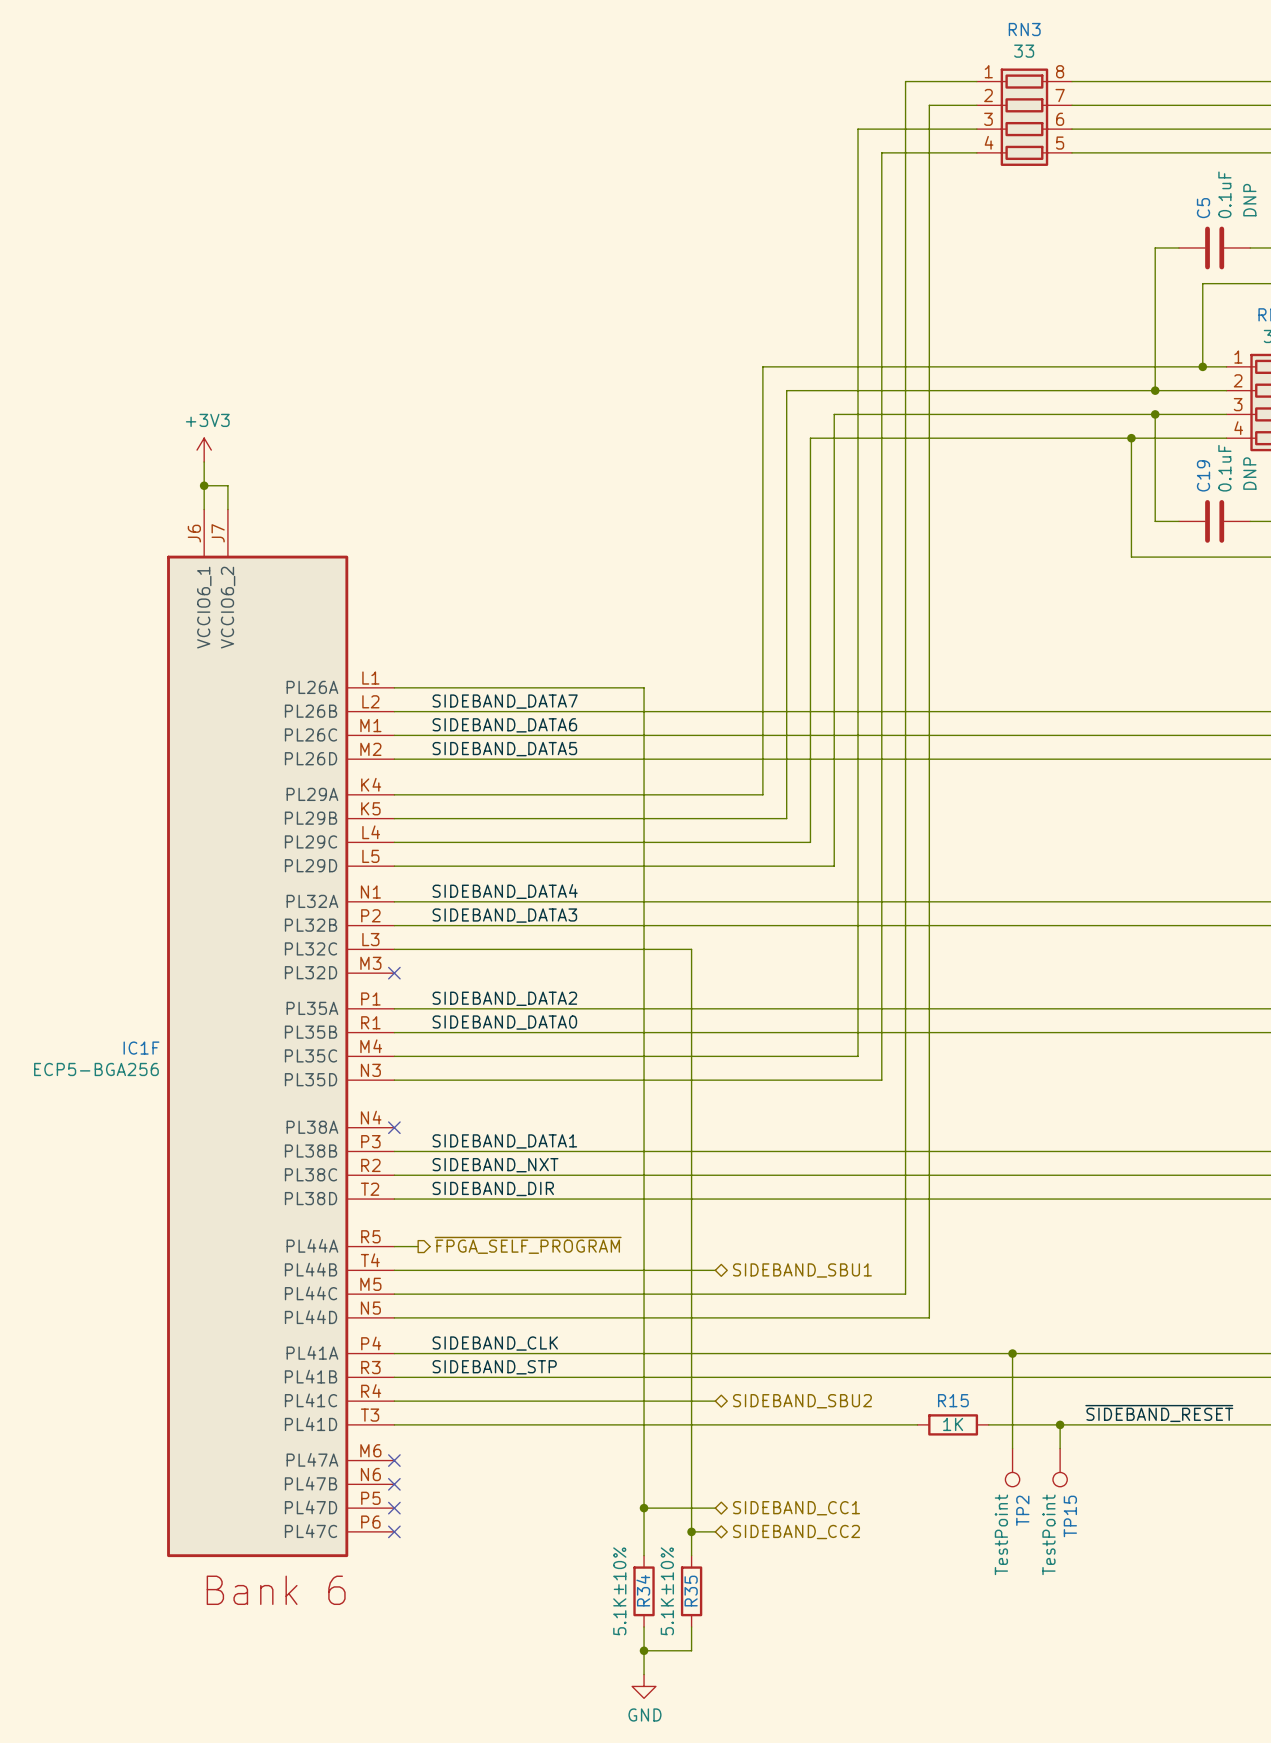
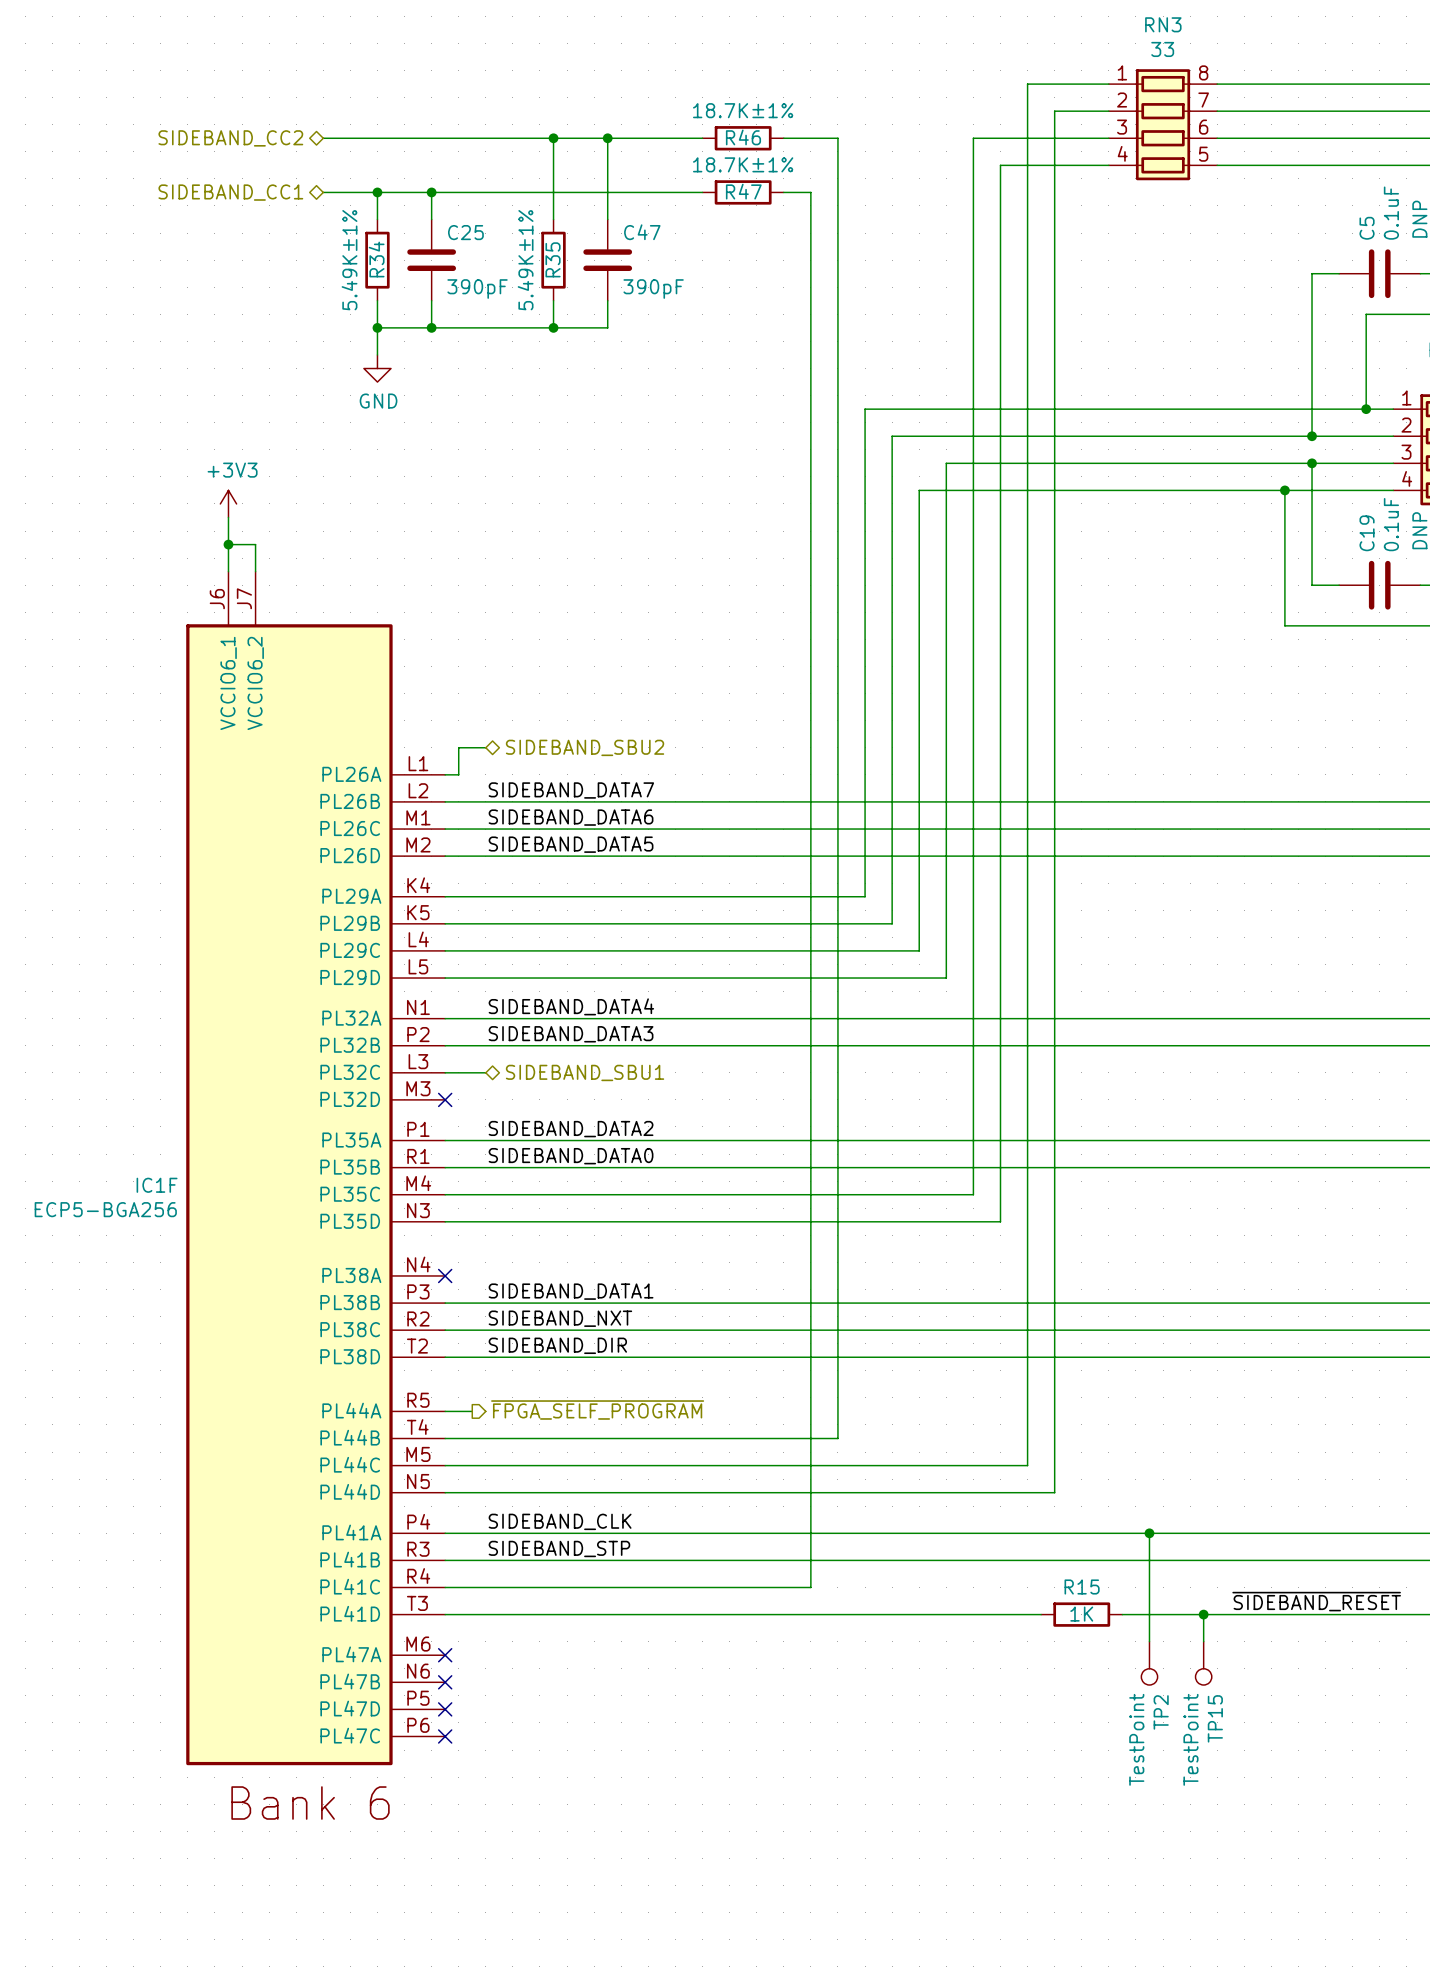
hierarchical label: none -> SIDEBAND_CC2 (230, 138)
wire: none -> (323, 138) (702, 138)
wire: none -> (553, 138) (553, 219)
junction: none -> (553, 138)
wire: none -> (607, 138) (607, 219)
junction: none -> (607, 138)
R46: none -> 18.7K±1% (743, 138)
wire: none -> (783, 138) (837, 138) (837, 1438) (810, 1438)
hierarchical label: none -> SIDEBAND_CC1 (230, 192)
wire: none -> (323, 192) (702, 192)
wire: none -> (377, 192) (377, 219)
junction: none -> (377, 192)
wire: none -> (431, 192) (431, 219)
junction: none -> (431, 192)
R47: none -> 18.7K±1% (743, 192)
wire: none -> (783, 192) (810, 192) (810, 1587)
C25: none -> 390pF (431, 260)
C47: none -> 390pF (607, 260)
wire: none -> (377, 300) (377, 354)
wire: none -> (431, 300) (431, 327)
wire: none -> (553, 300) (553, 327)
wire: none -> (607, 300) (607, 327) (377, 327)
junction: none -> (377, 327)
junction: none -> (431, 327)
junction: none -> (553, 327)
power symbol: none -> GND (377, 368)
hierarchical label: none -> SIDEBAND_SBU2 (585, 747)
wire: (406, 687) (644, 687) (644, 1555) -> (458, 774) (458, 747) (485, 747)
wire: (430, 949) (691, 949) (691, 1555) -> none
hierarchical label: none -> SIDEBAND_SBU1 (585, 1072)
hierarchical label: SIDEBAND_SBU1 (802, 1270) -> none
hierarchical label: SIDEBAND_SBU2 (802, 1401) -> none
wire: (644, 1508) (715, 1508) -> none
junction: (644, 1508) -> none
hierarchical label: SIDEBAND_CC1 (796, 1508) -> none
wire: (691, 1531) (715, 1531) -> none
junction: (691, 1531) -> none
hierarchical label: SIDEBAND_CC2 (796, 1532) -> none
R34 value: 5.1K±10% (619, 1591) -> 5.49K±1% (349, 260)
R34 position: (644, 1591) -> (377, 260)
R35 value: 5.1K±10% (667, 1591) -> 5.49K±1% (525, 260)
R35 position: (691, 1591) -> (553, 260)
wire: (644, 1626) (644, 1674) -> none
wire: (691, 1626) (691, 1650) (644, 1650) -> none
junction: (644, 1650) -> none
power symbol: GND (644, 1686) -> none

